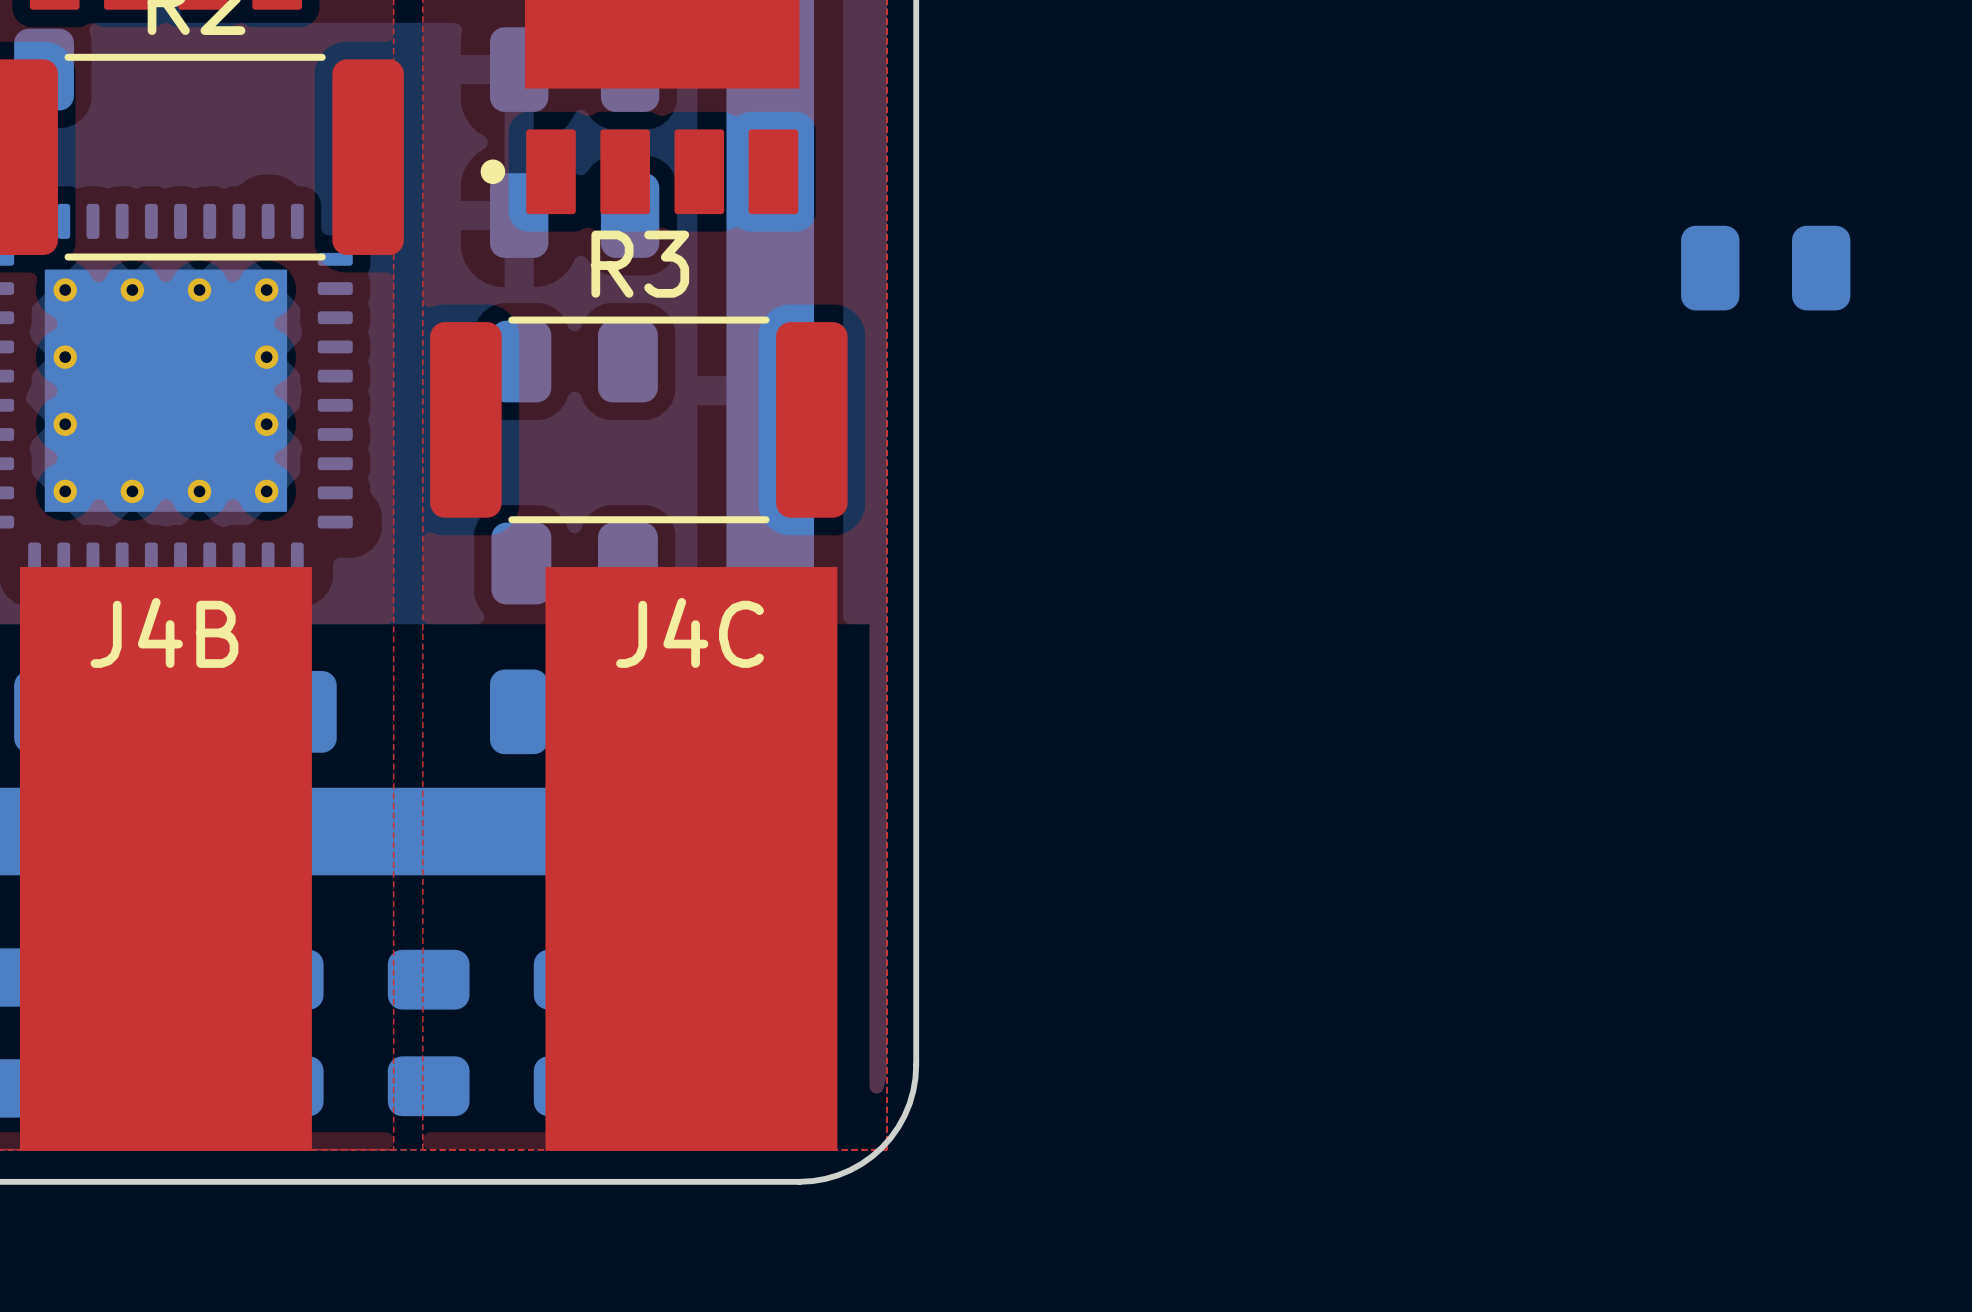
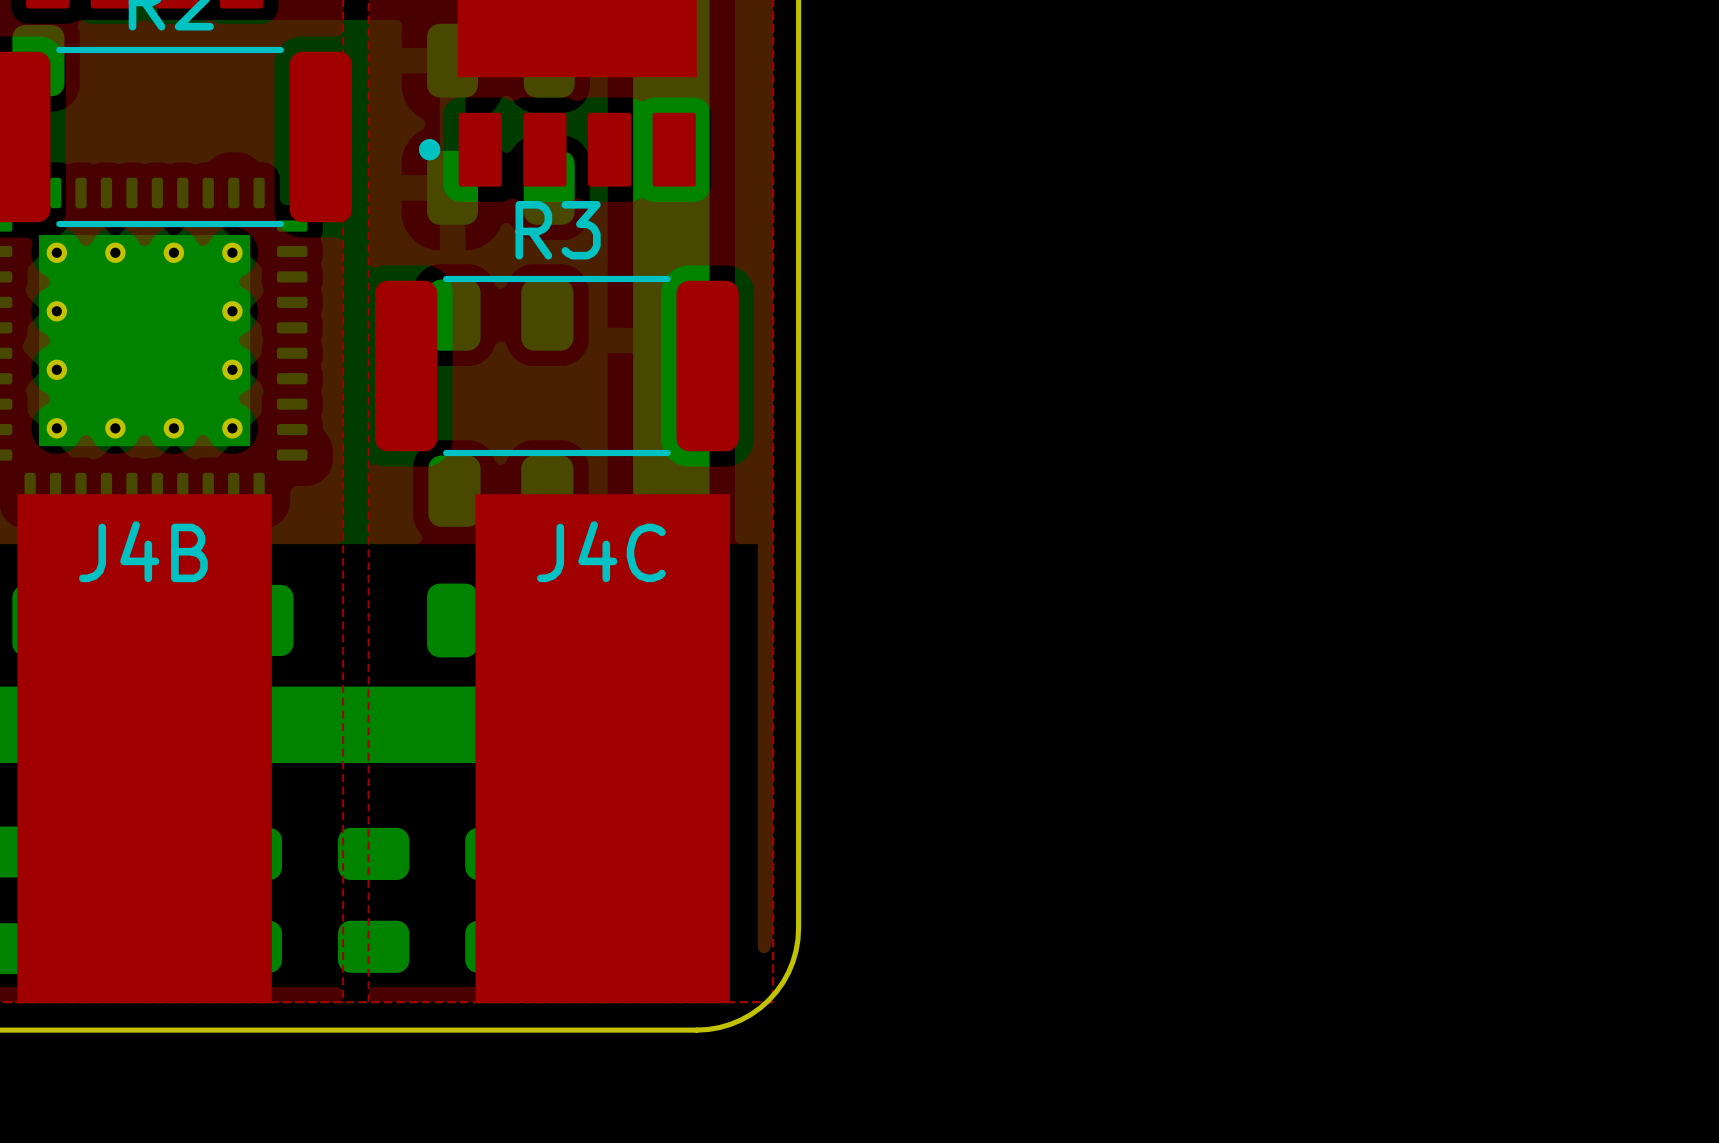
part: (1765, 268) -> none

